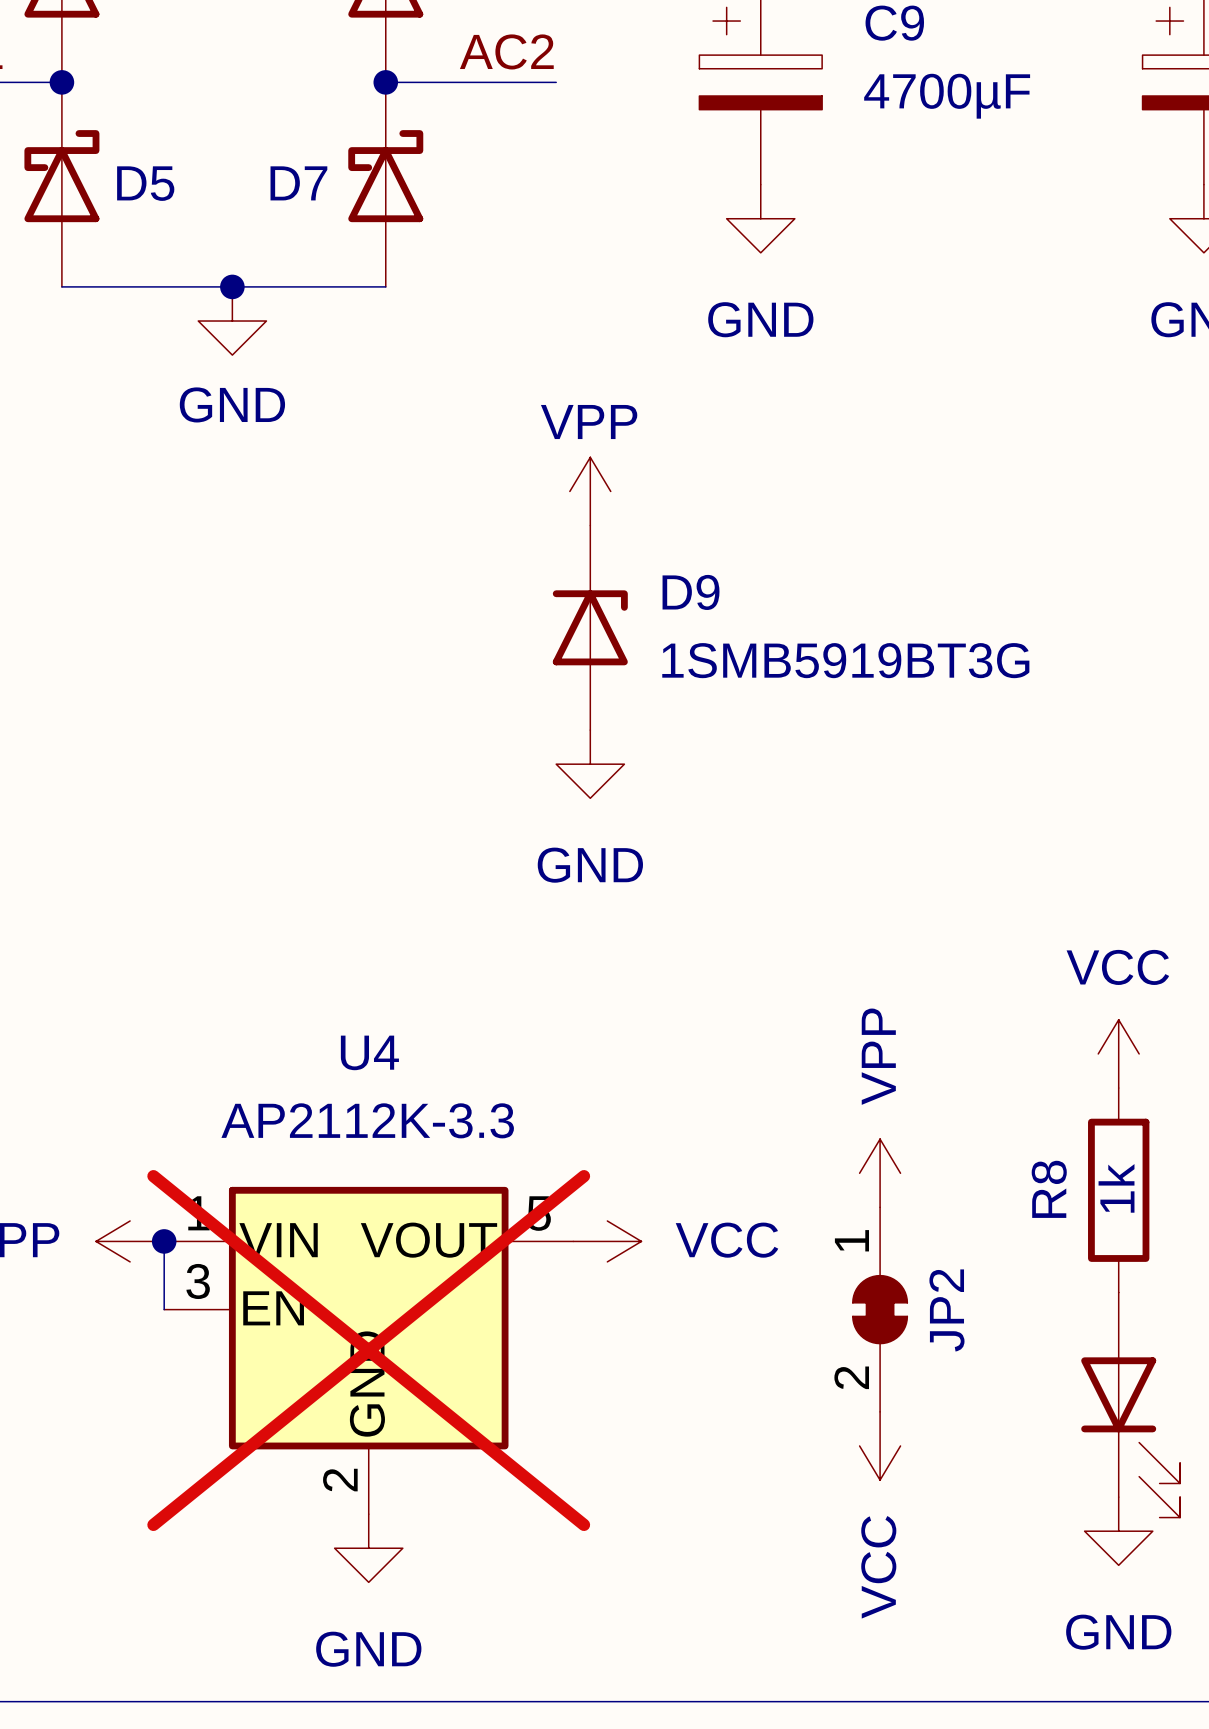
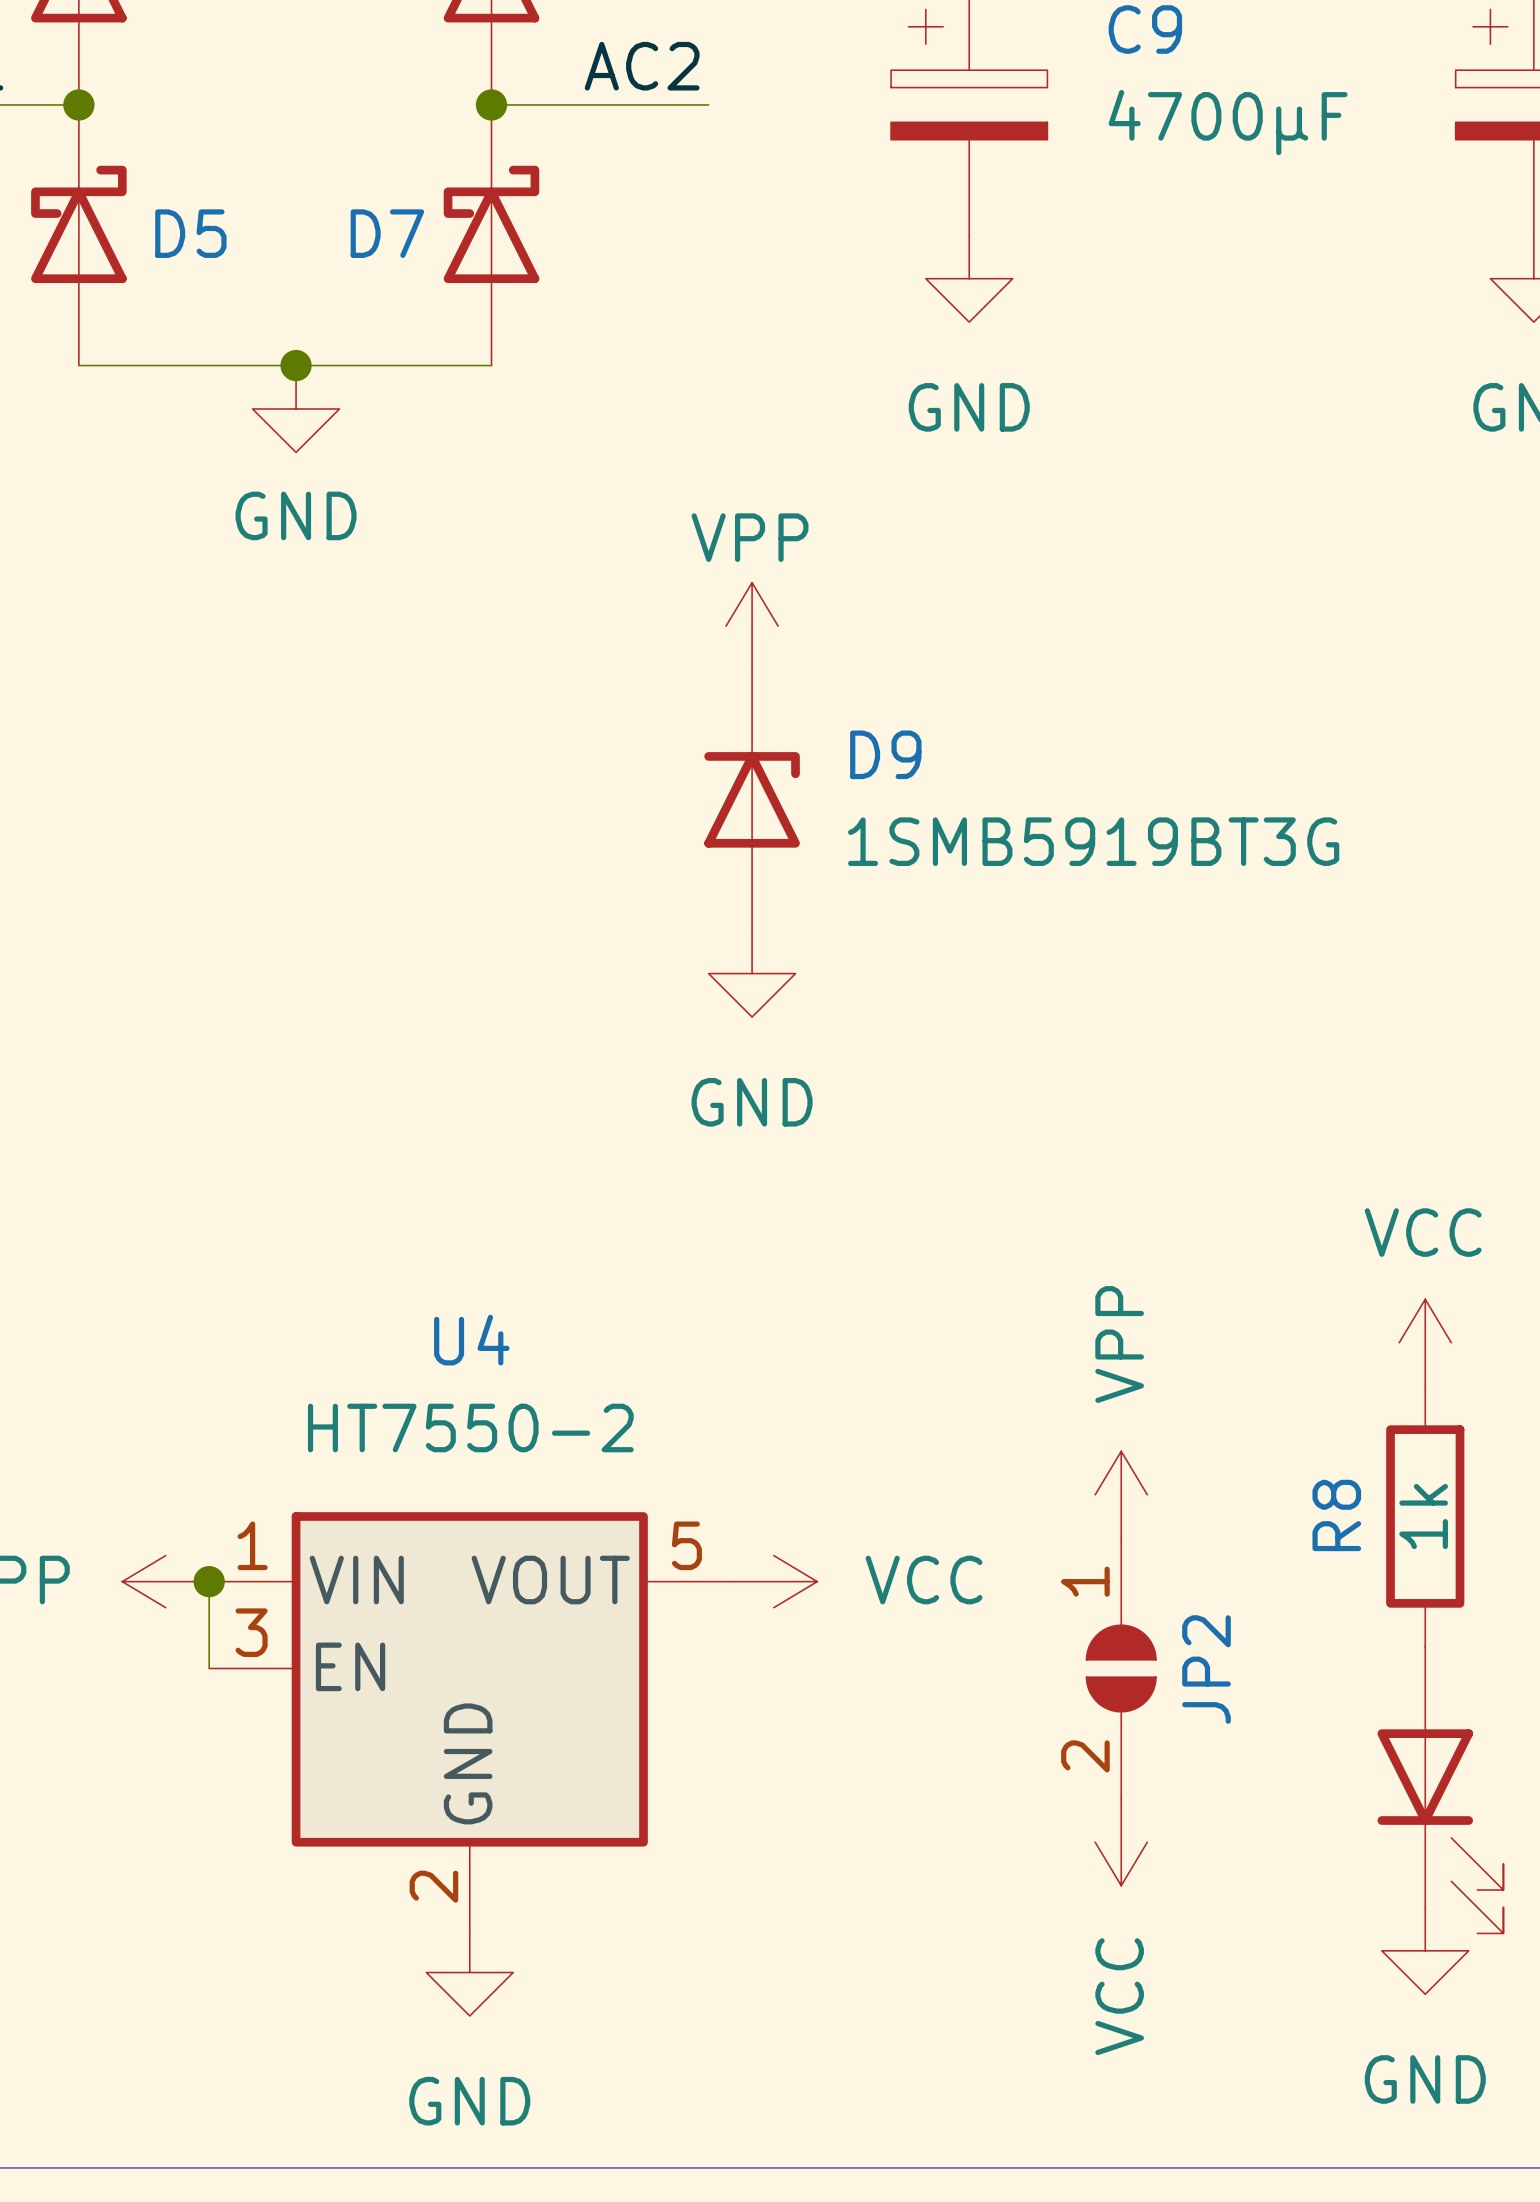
U4 value: AP2112K-3.3 (367, 1120) -> HT7550-2 (470, 1428)
JP2 symbol: [852, 1207, 908, 1412] -> [1086, 1538, 1156, 1799]
U4 do-not-place cross: (368, 1350) -> none

